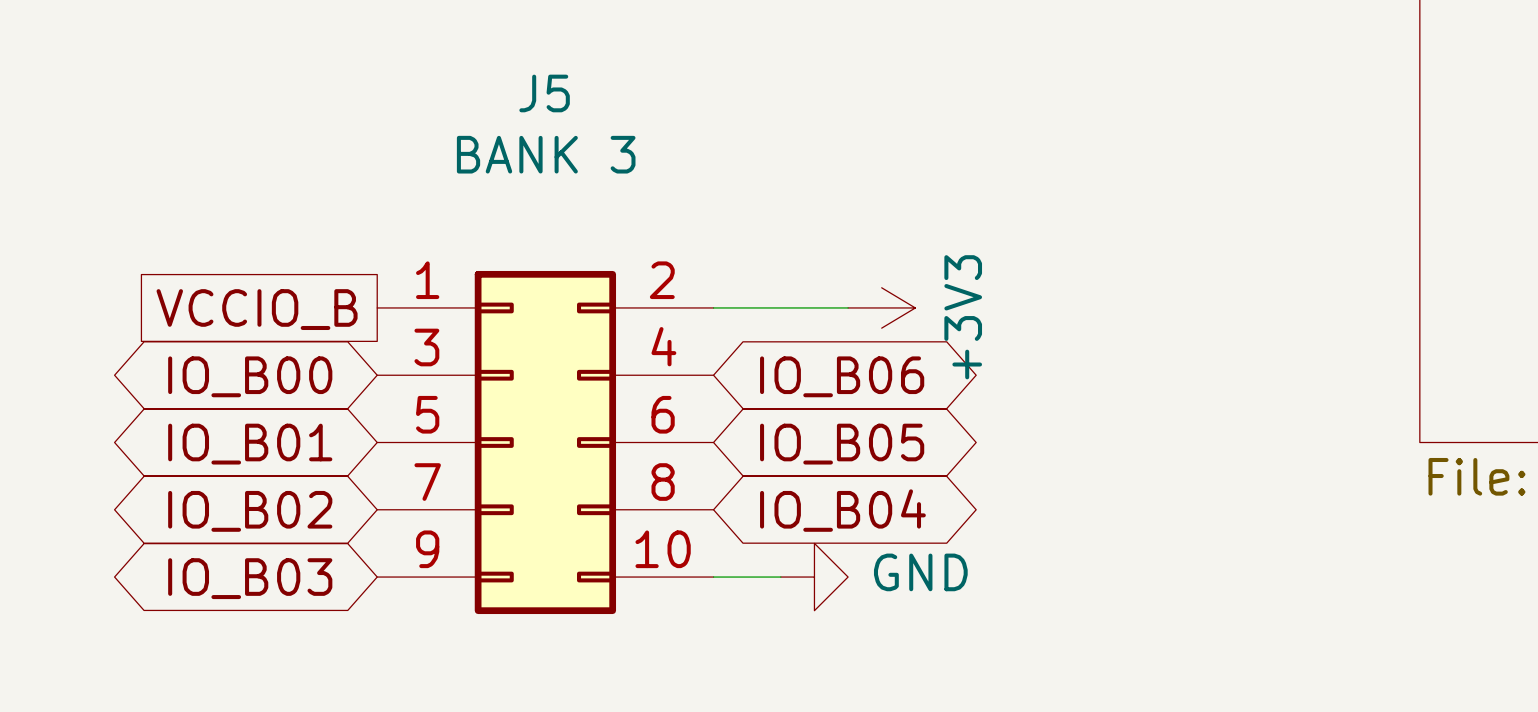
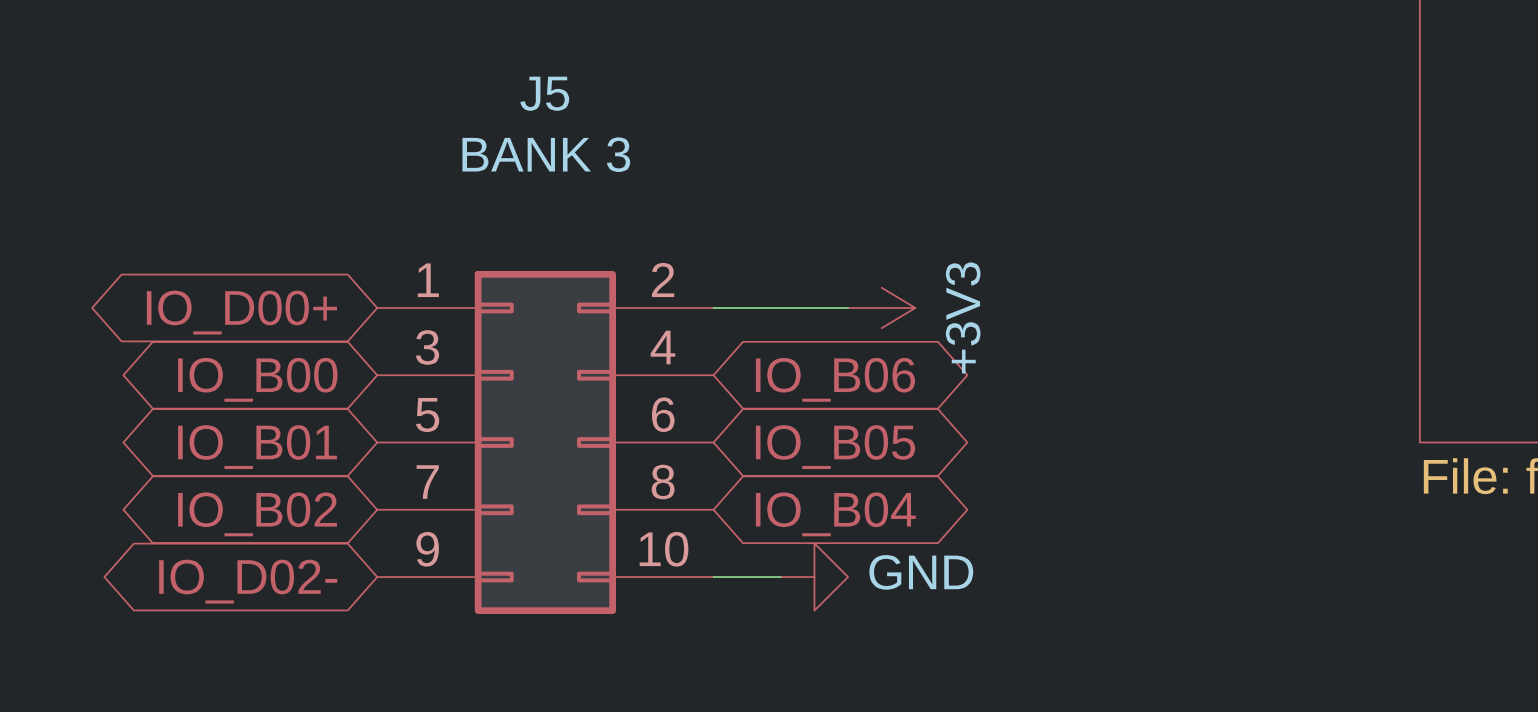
global label shape: passive (257, 309) -> bidirectional (241, 312)
global label: VCCIO_B (257, 309) -> IO_D00+ (241, 312)
global label: IO_B03 (250, 578) -> IO_D02- (248, 581)

